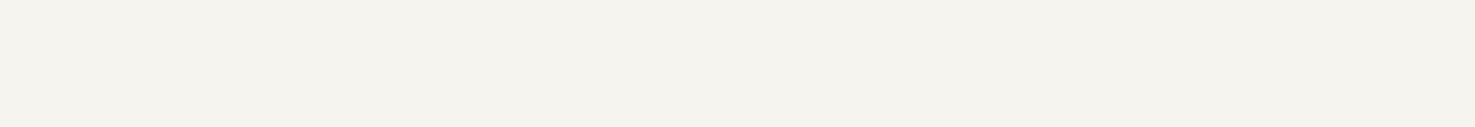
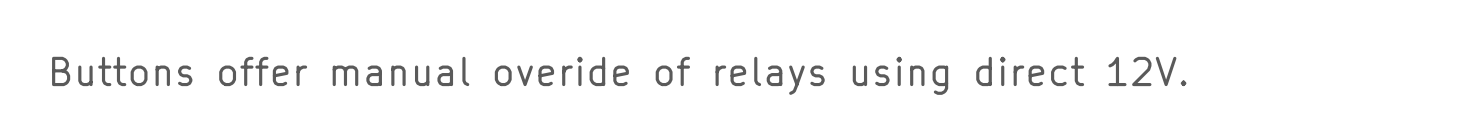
text: none -> Buttons offer manual overide of relays using direct 12V. (619, 75)

